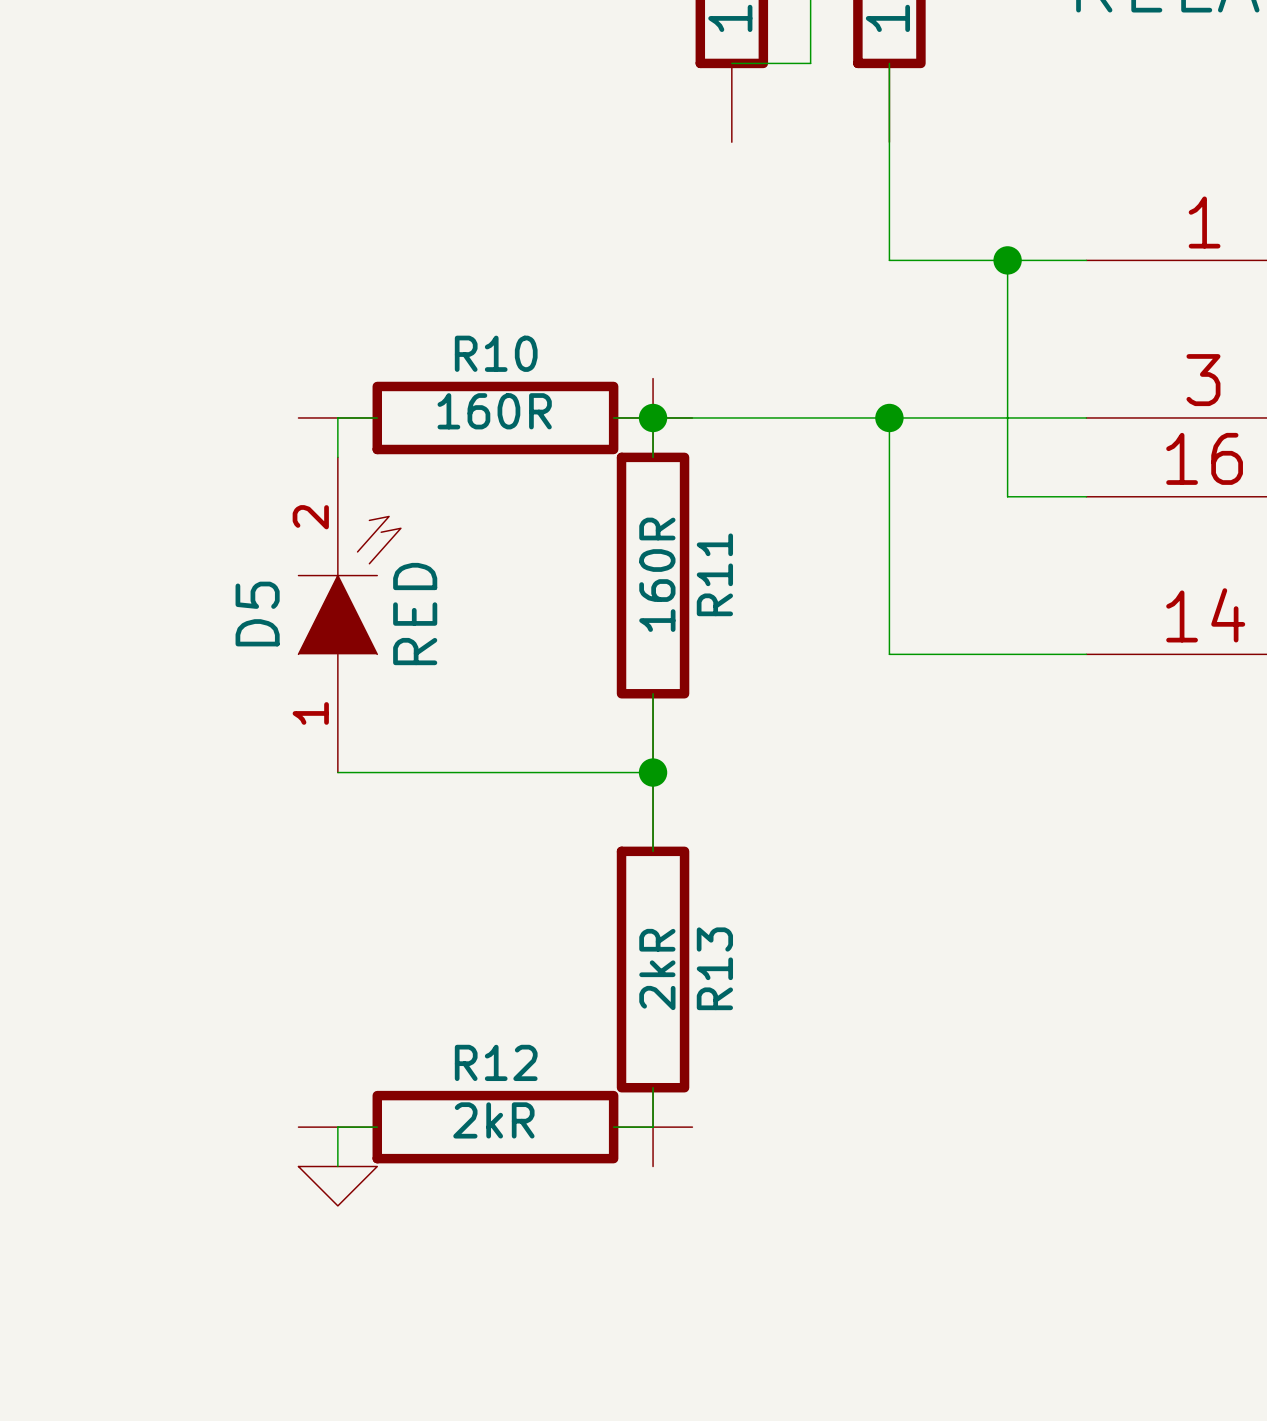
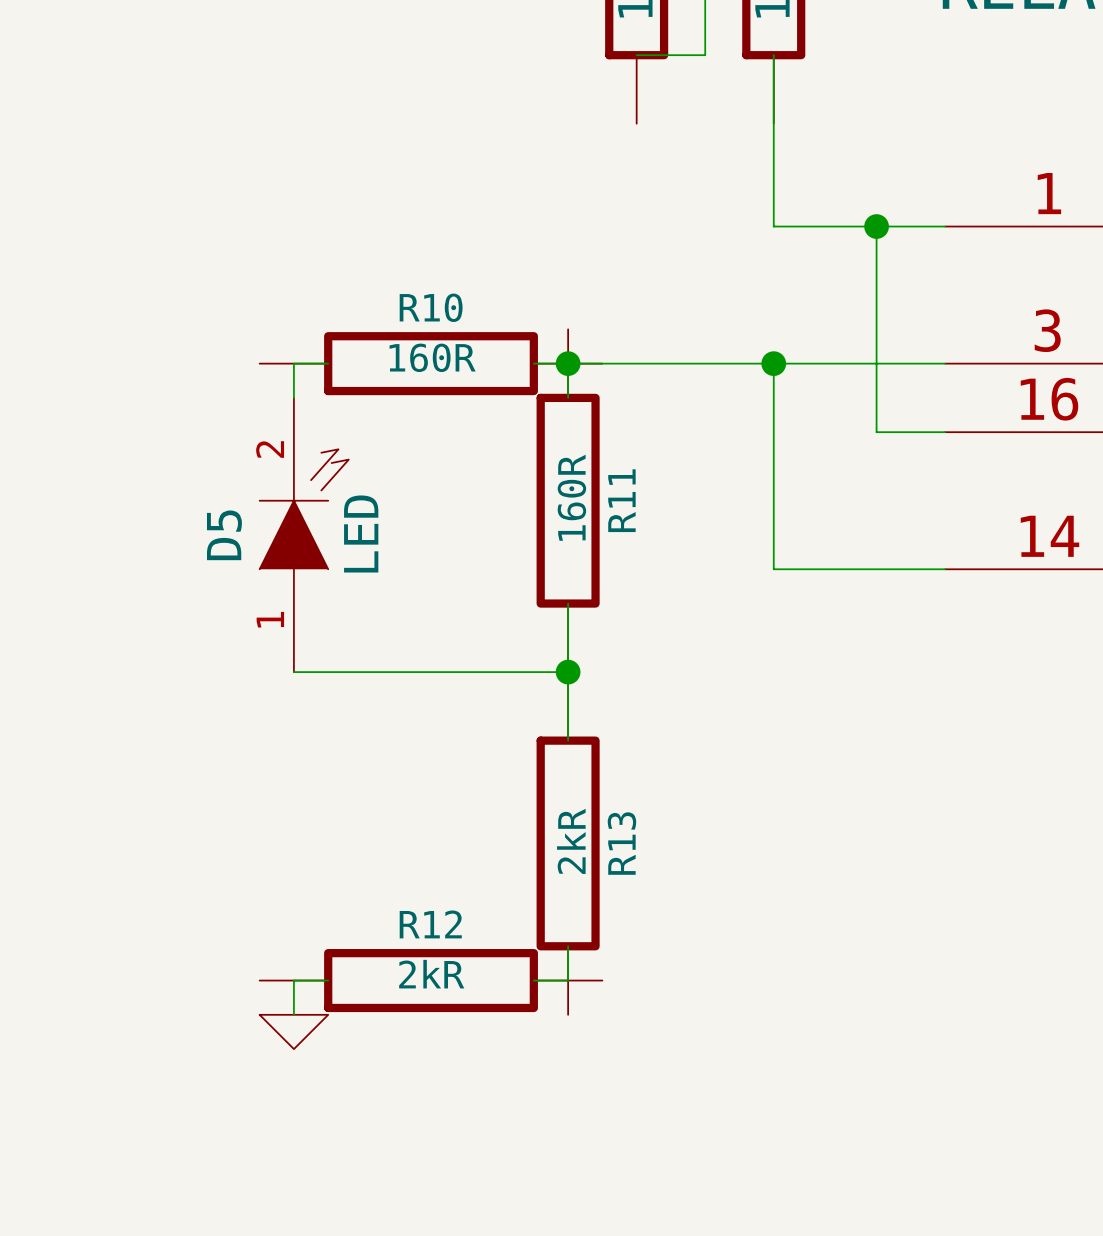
D5 value: RED (415, 614) -> LED (361, 533)

